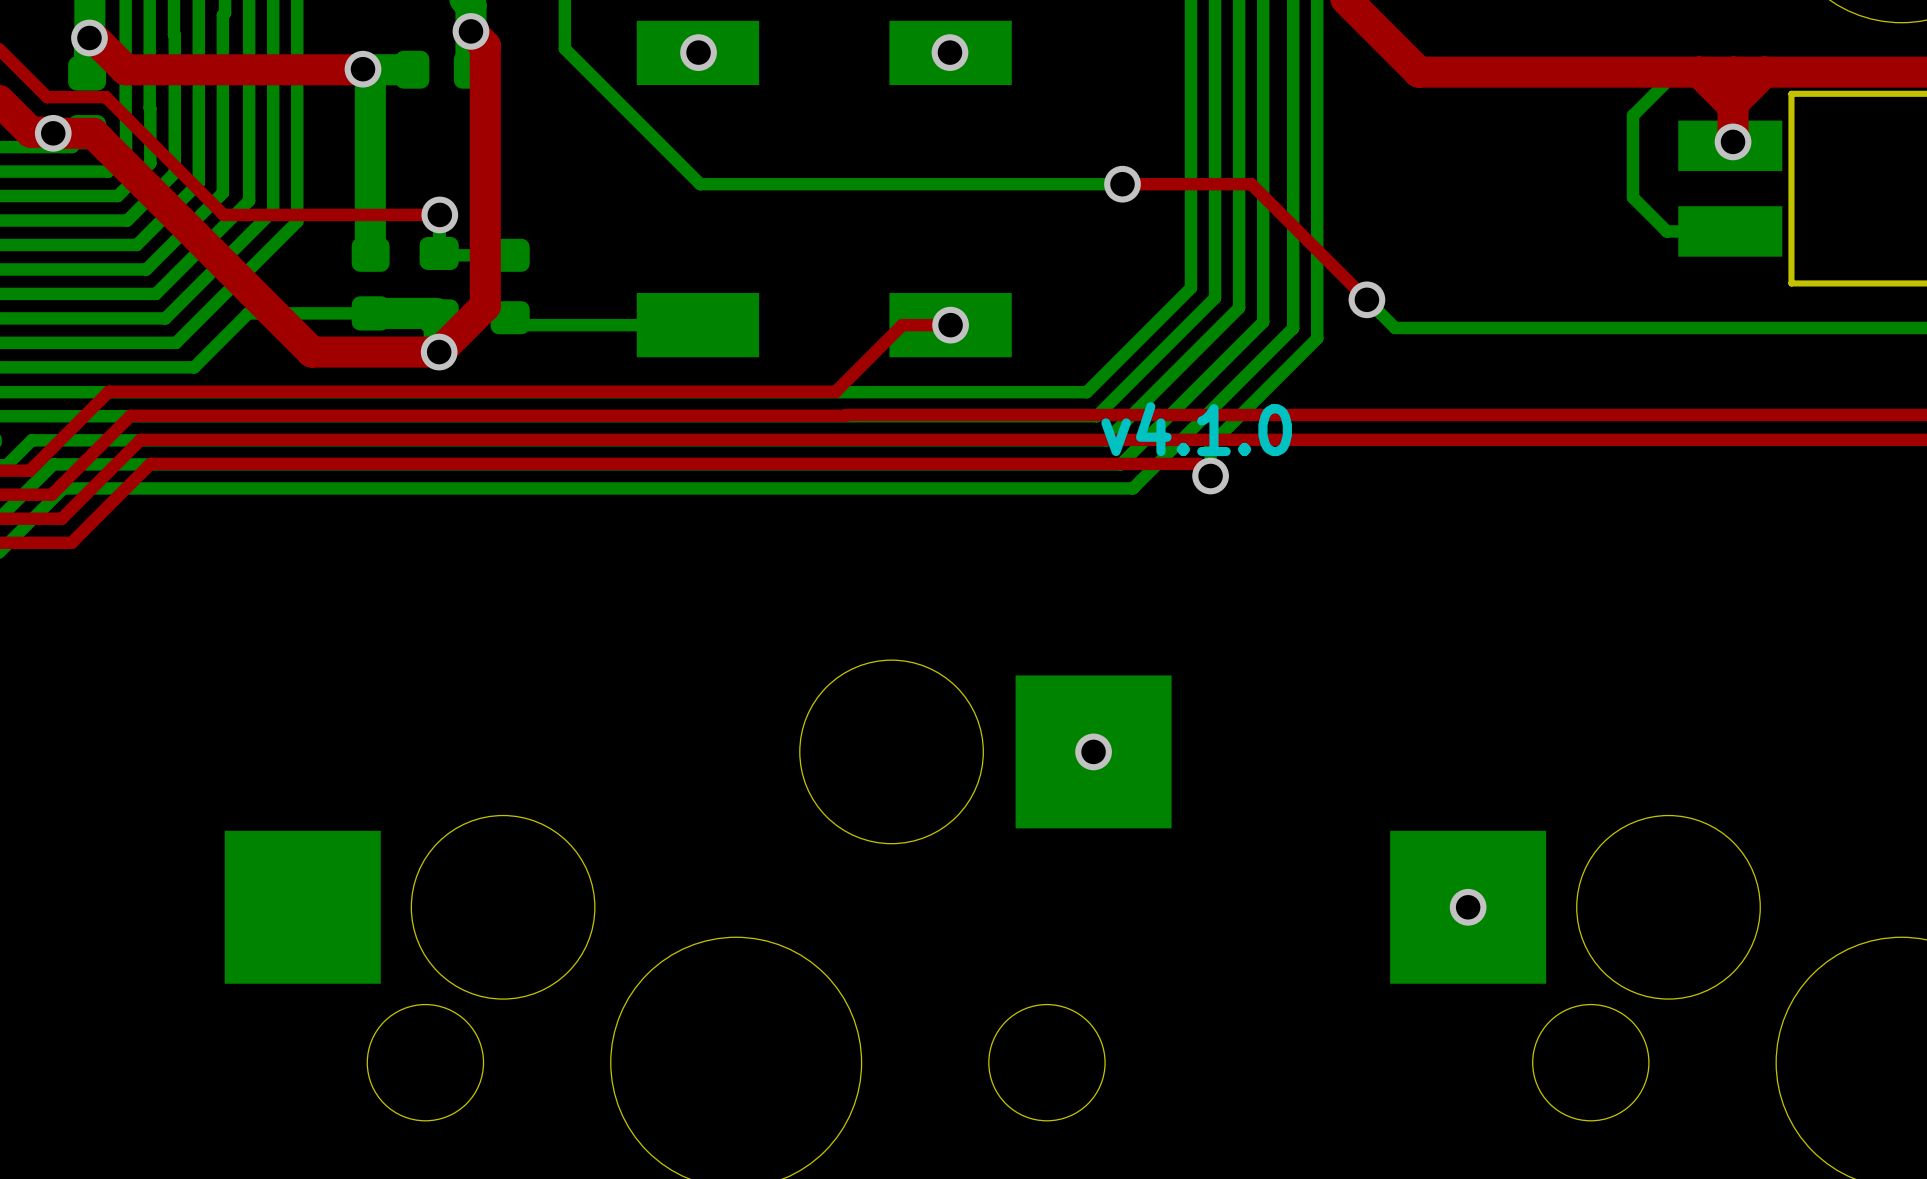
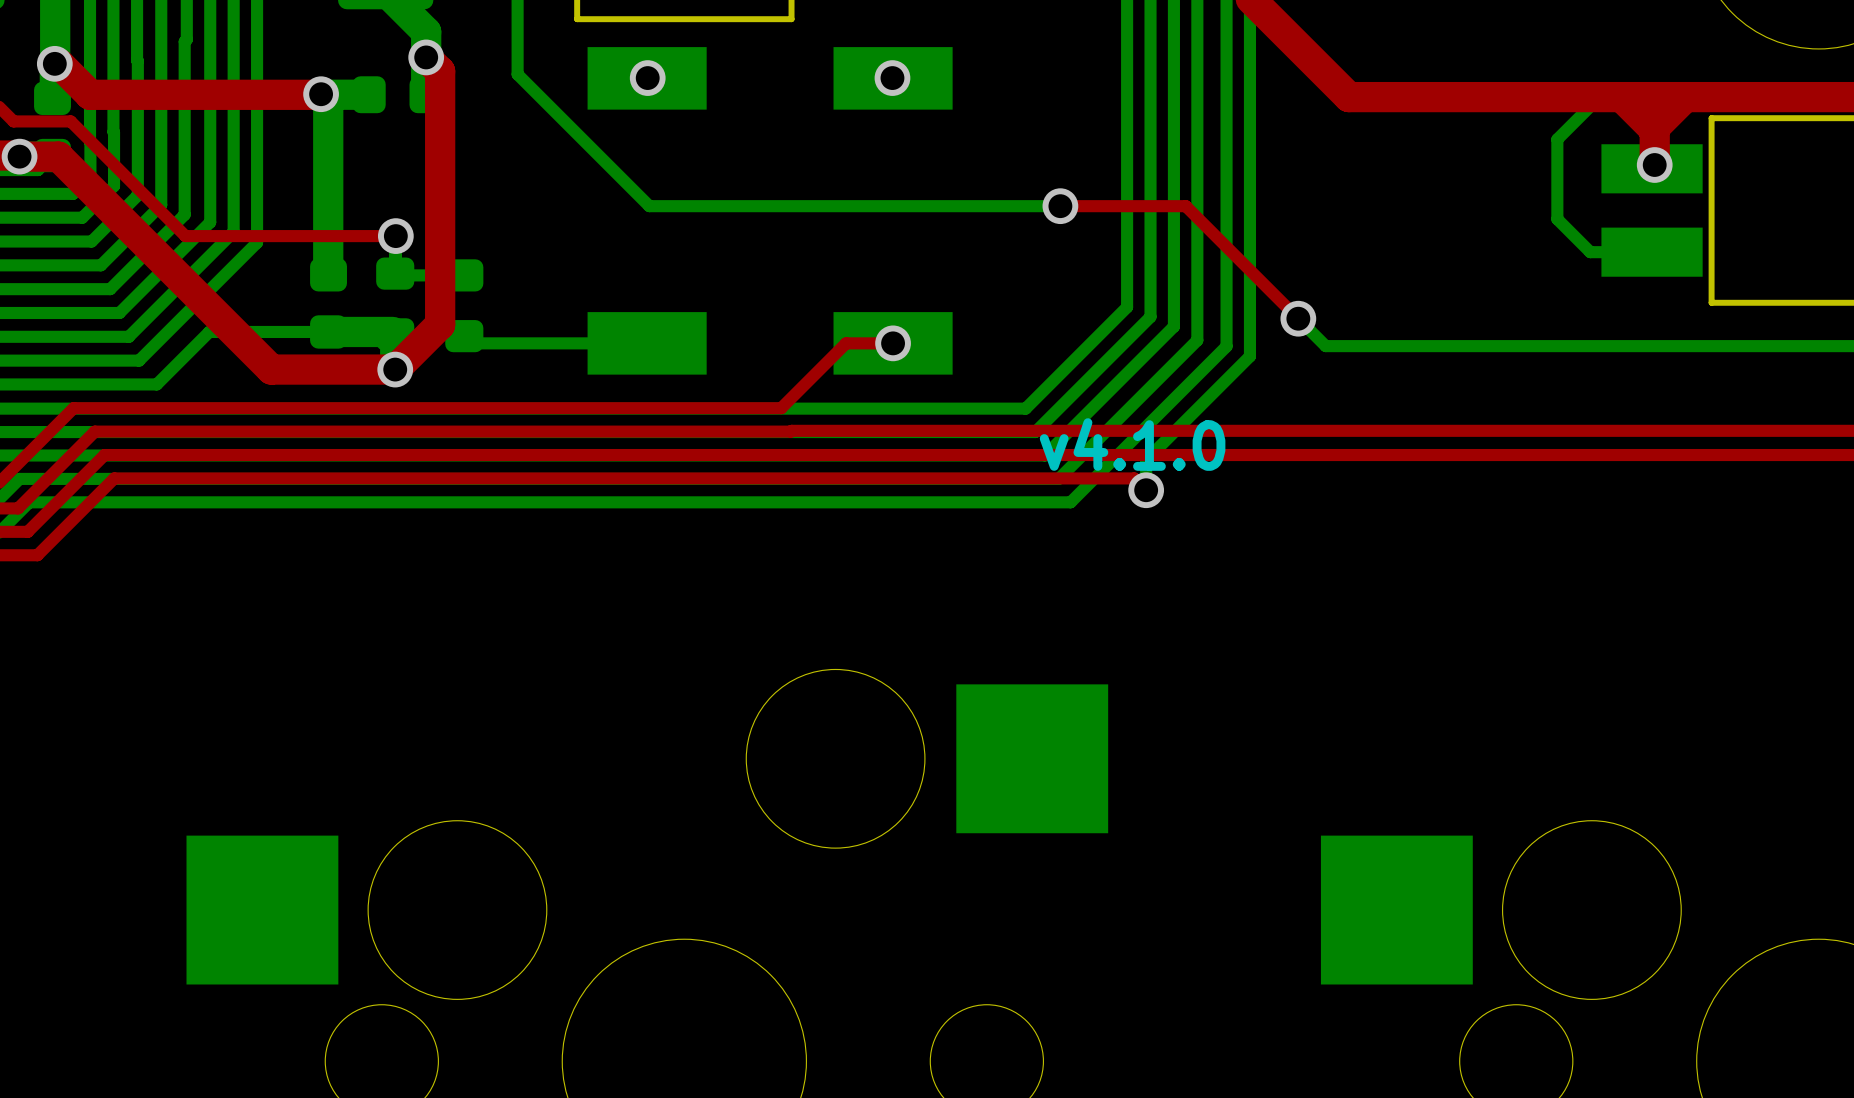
via: (1093, 751) -> none
via: (1468, 907) -> none

